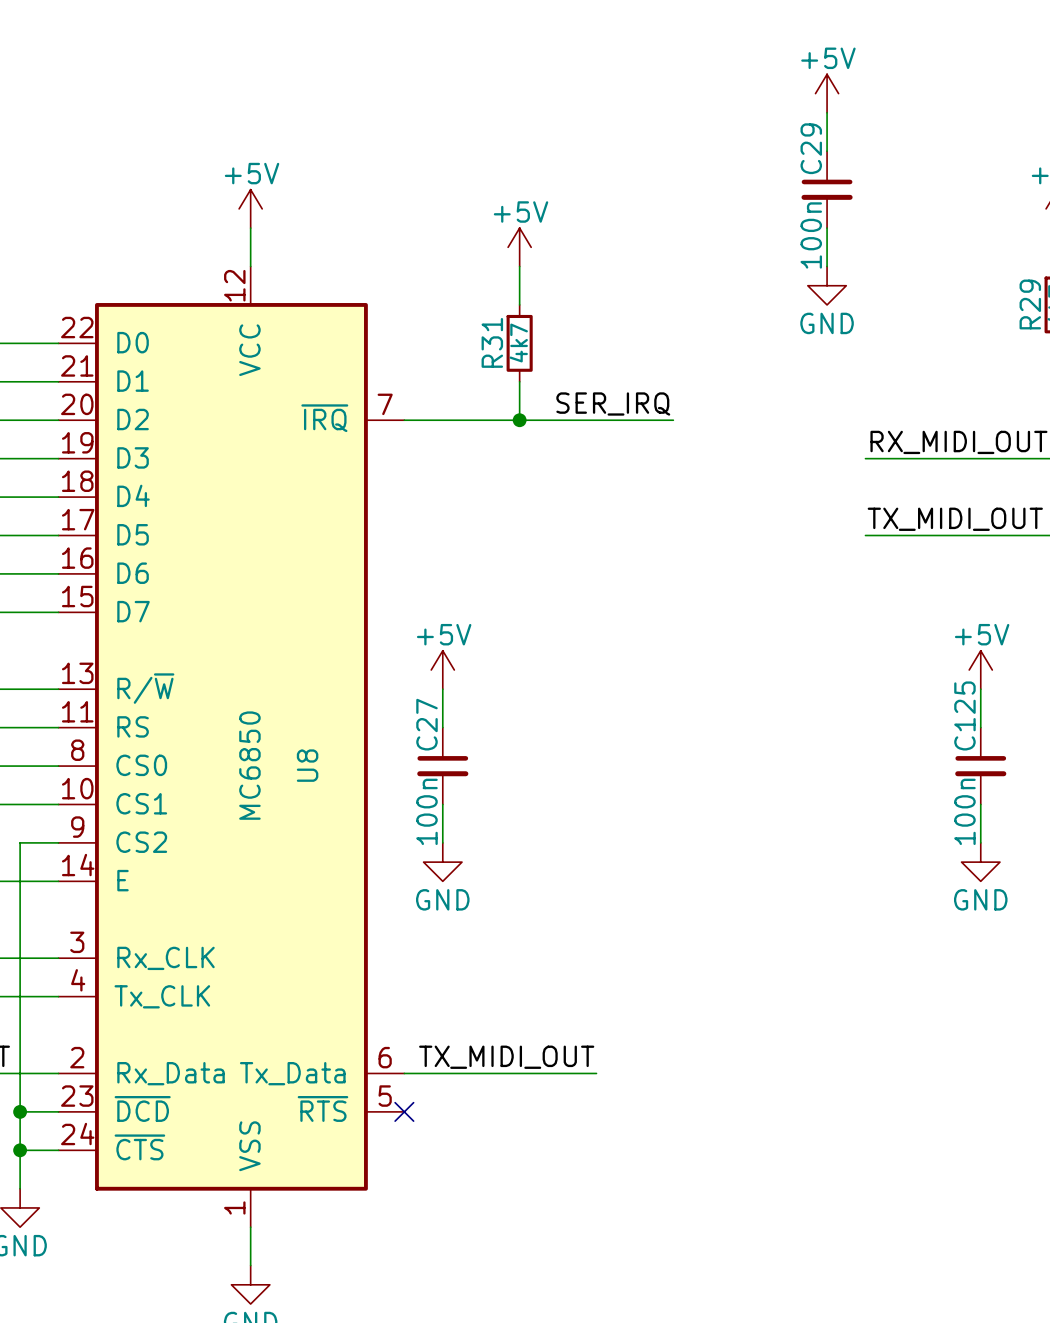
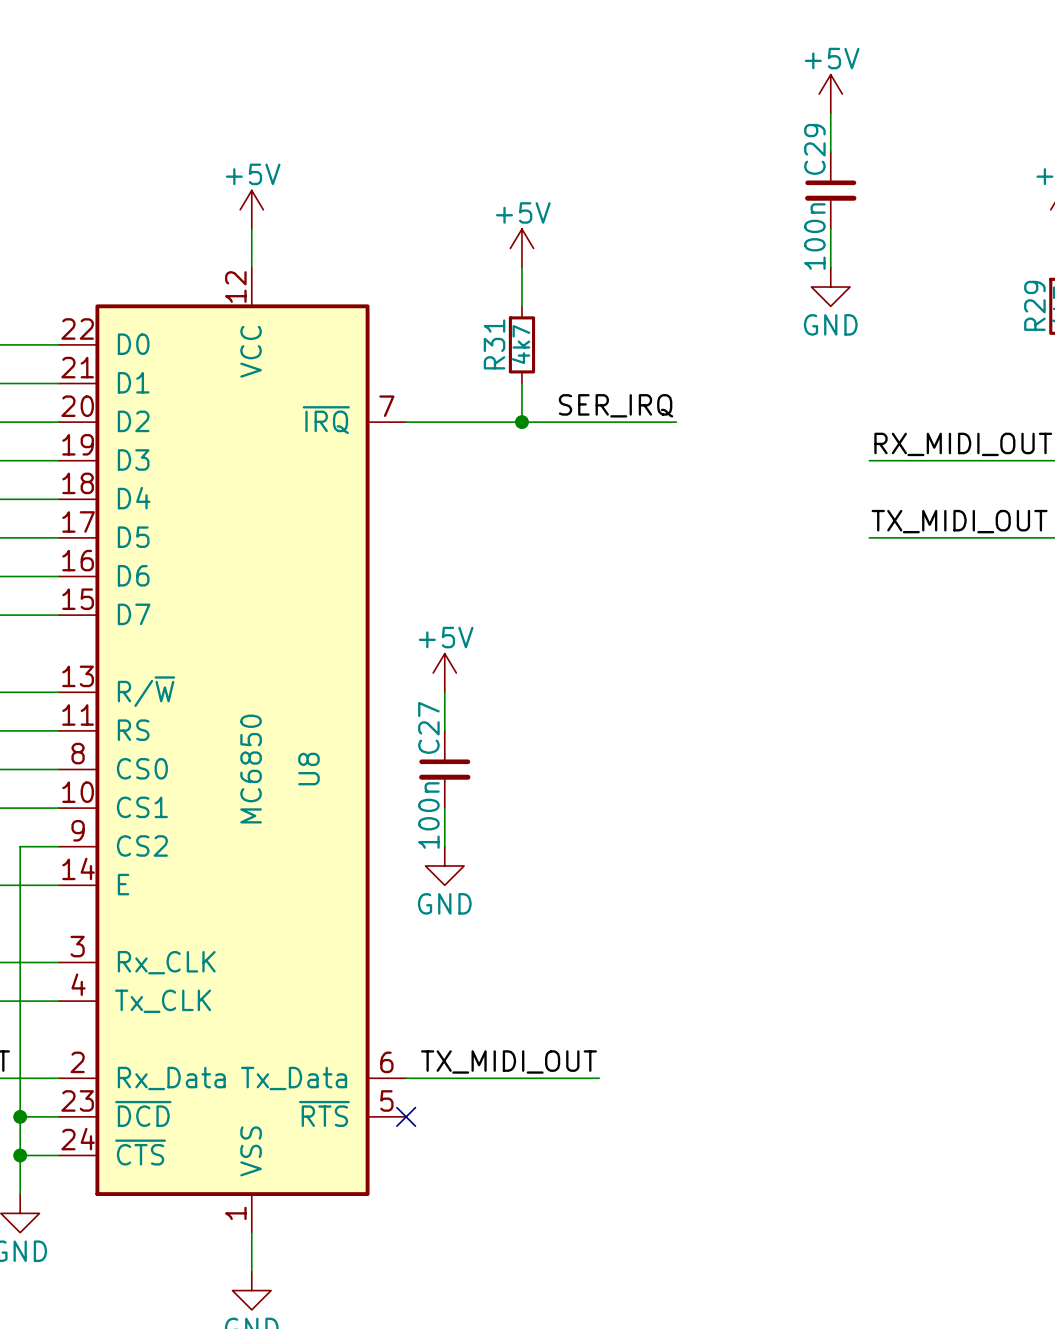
power symbol: +5V (980, 669) -> none
wire: (980, 689) (980, 727) -> none
C125: 100n (980, 766) -> none
wire: (980, 804) (980, 842) -> none
power symbol: GND (980, 862) -> none

